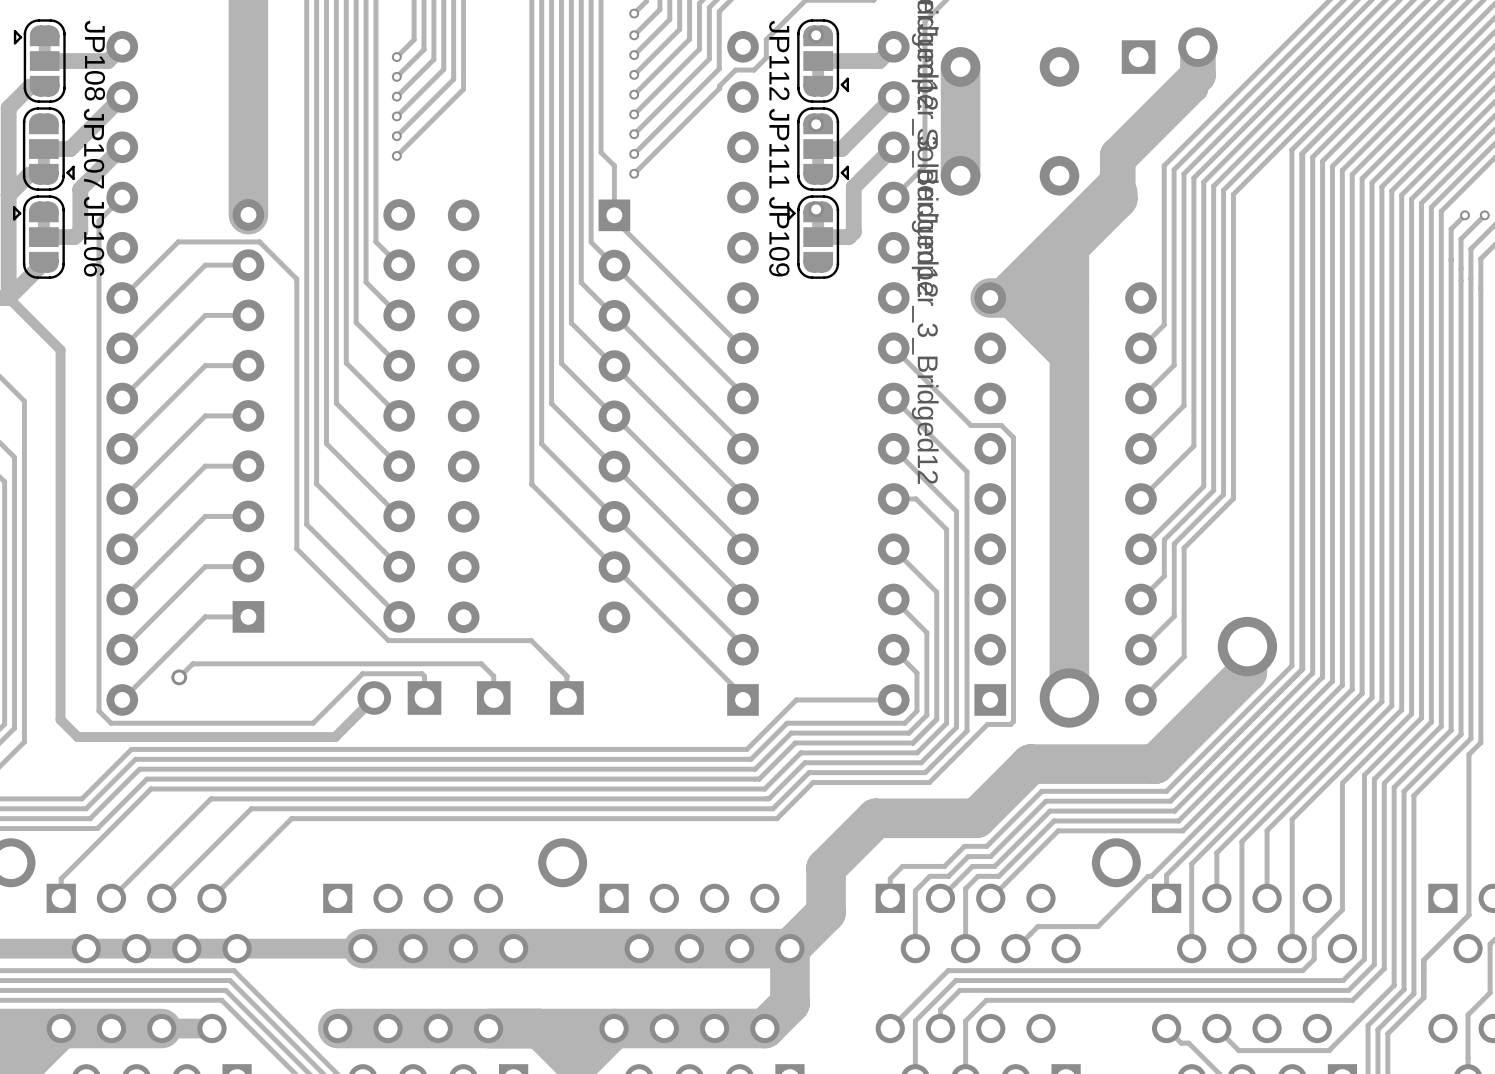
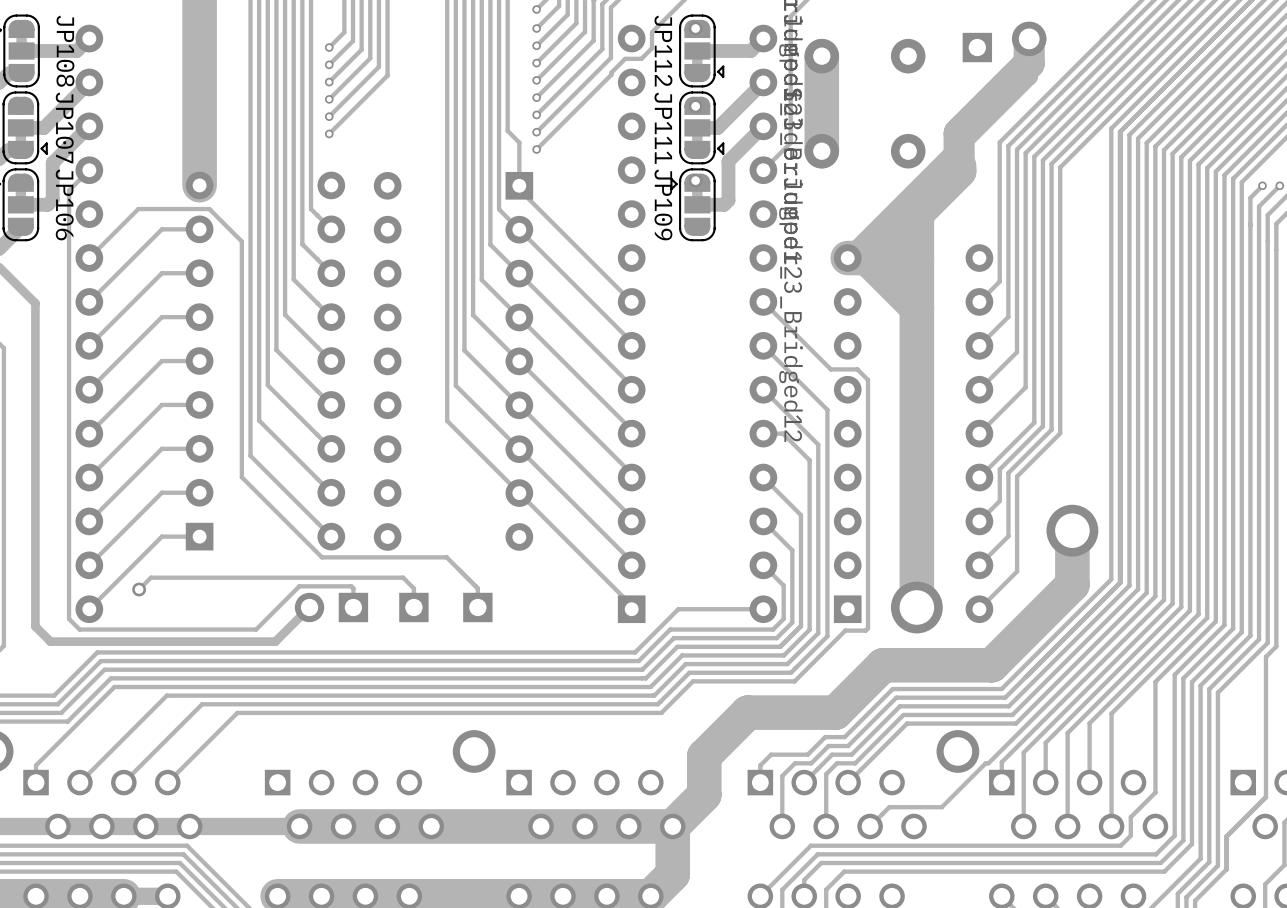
via position: (1247, 646) -> (1072, 530)

